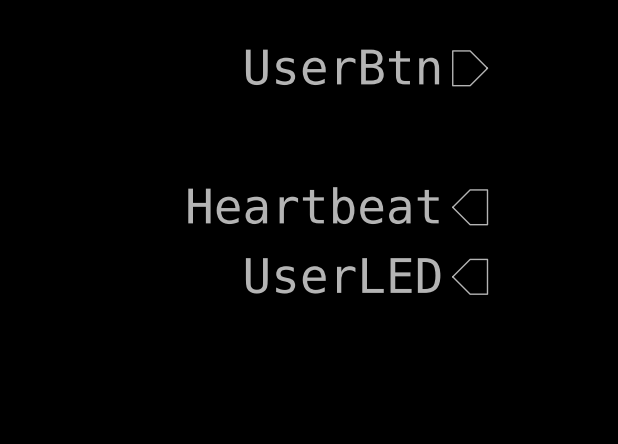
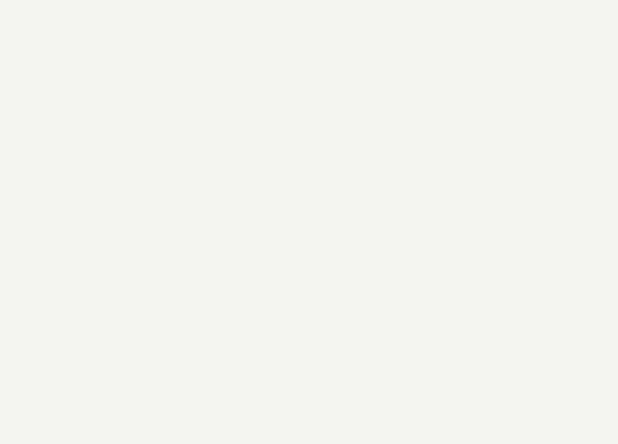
hierarchical label: UserBtn (342, 67) -> none
hierarchical label: Heartbeat (313, 205) -> none
hierarchical label: UserLED (343, 275) -> none

